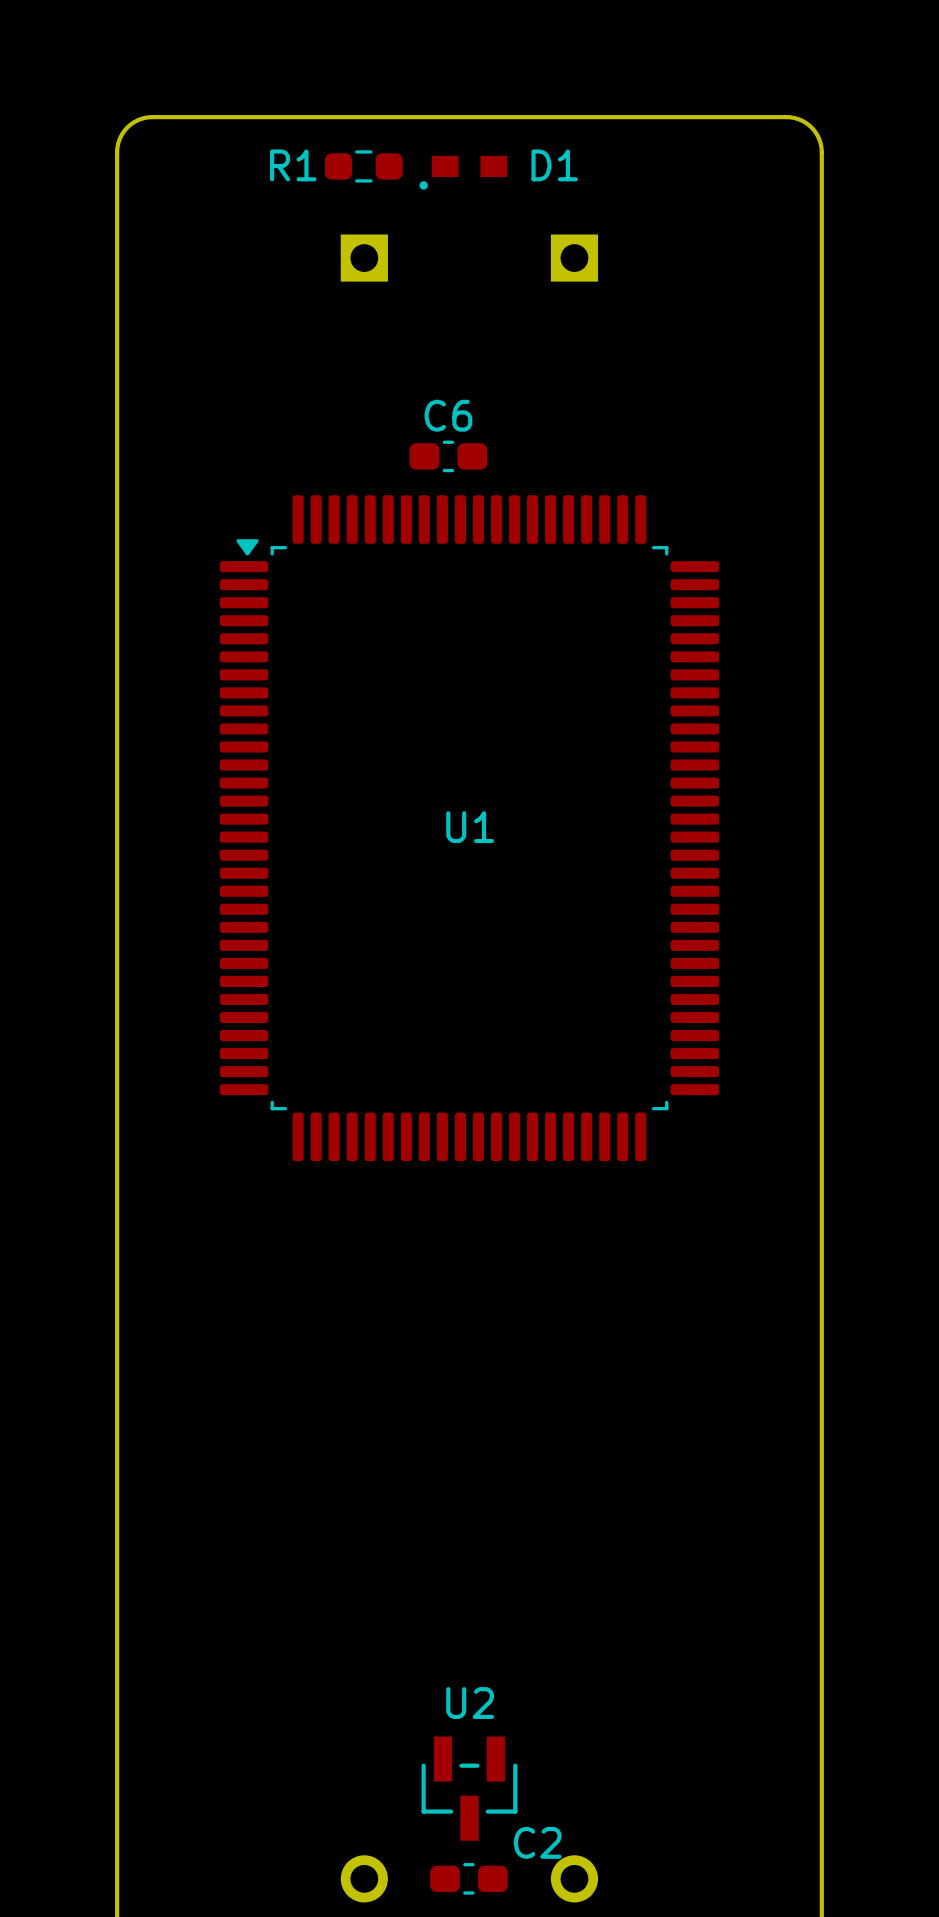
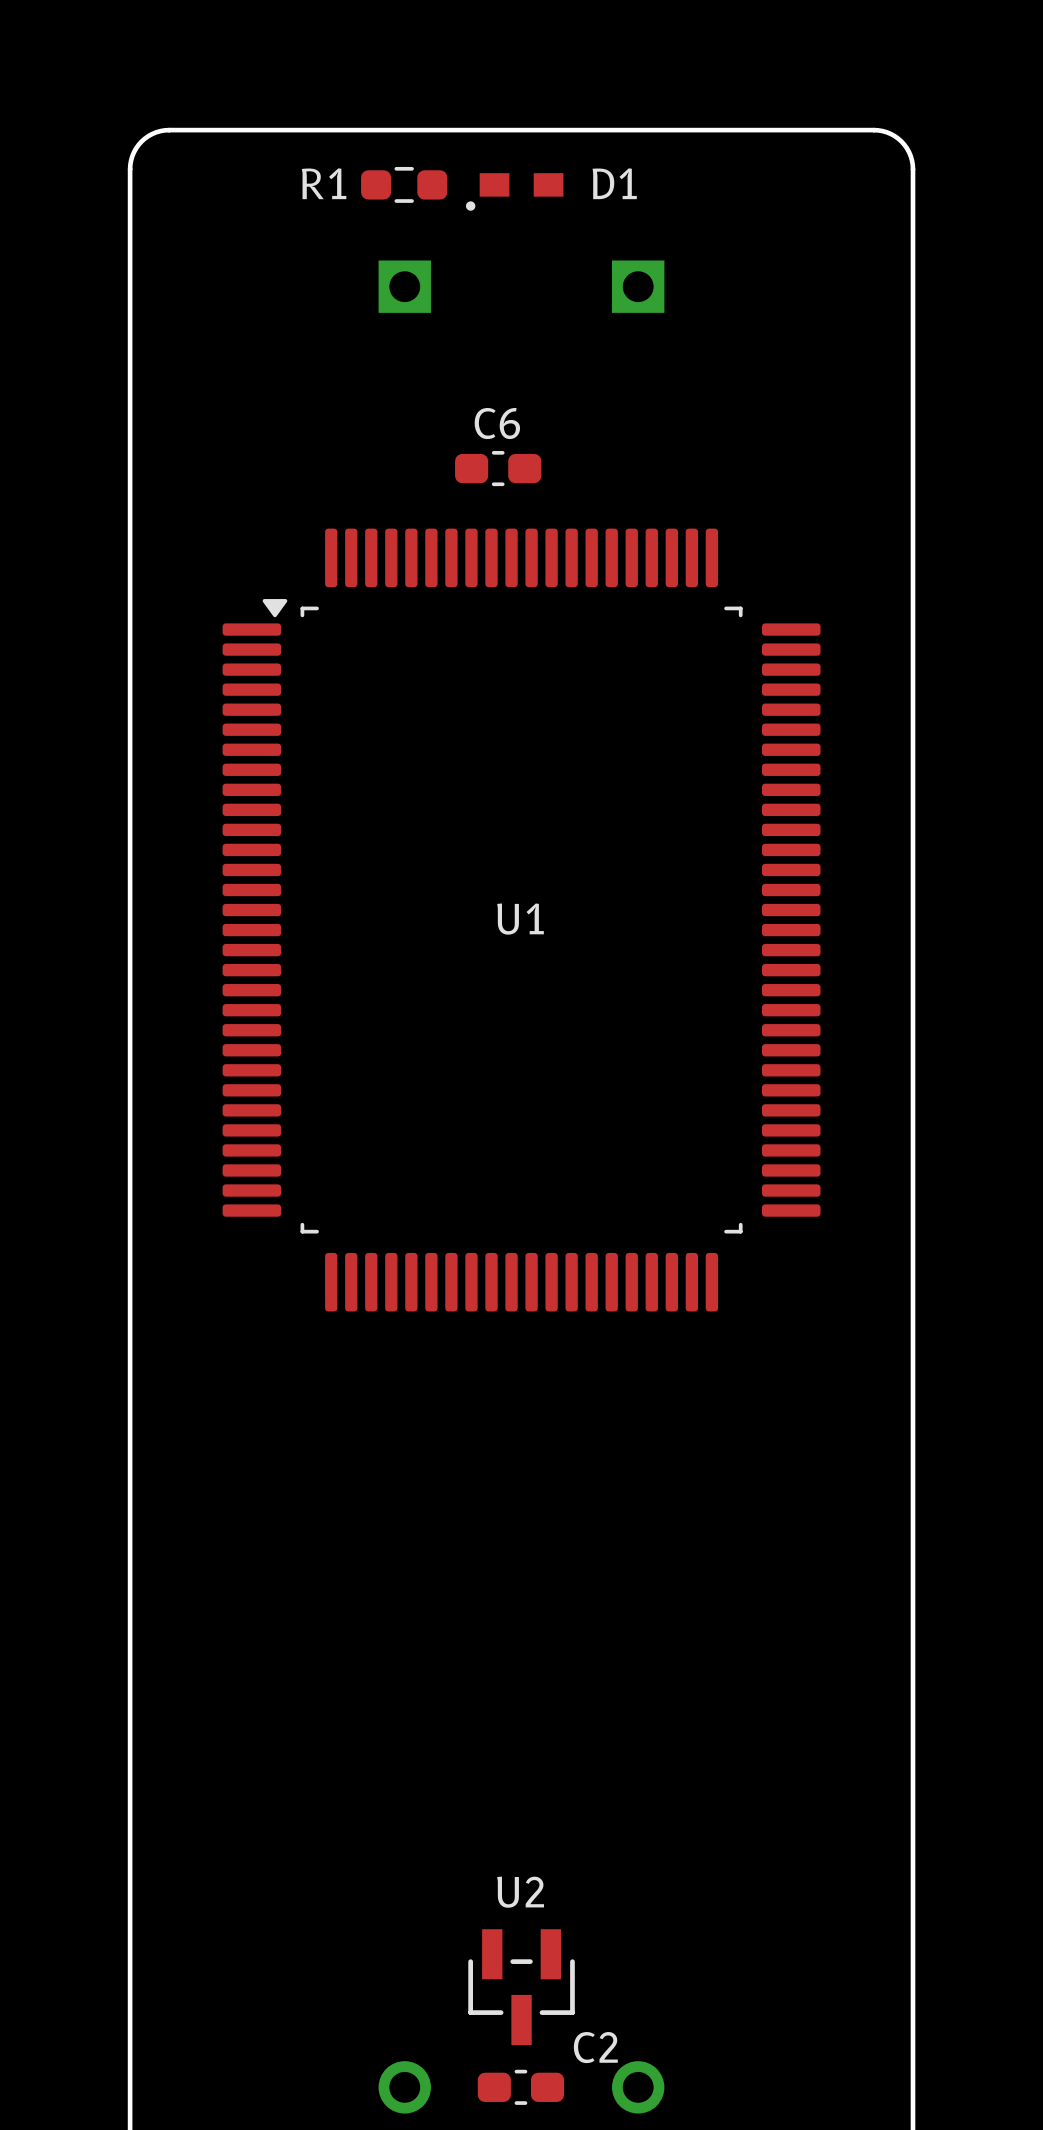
C6 position: (448, 456) -> (498, 468)
U1 footprint: [219, 495, 720, 1162] -> [222, 528, 821, 1312]

